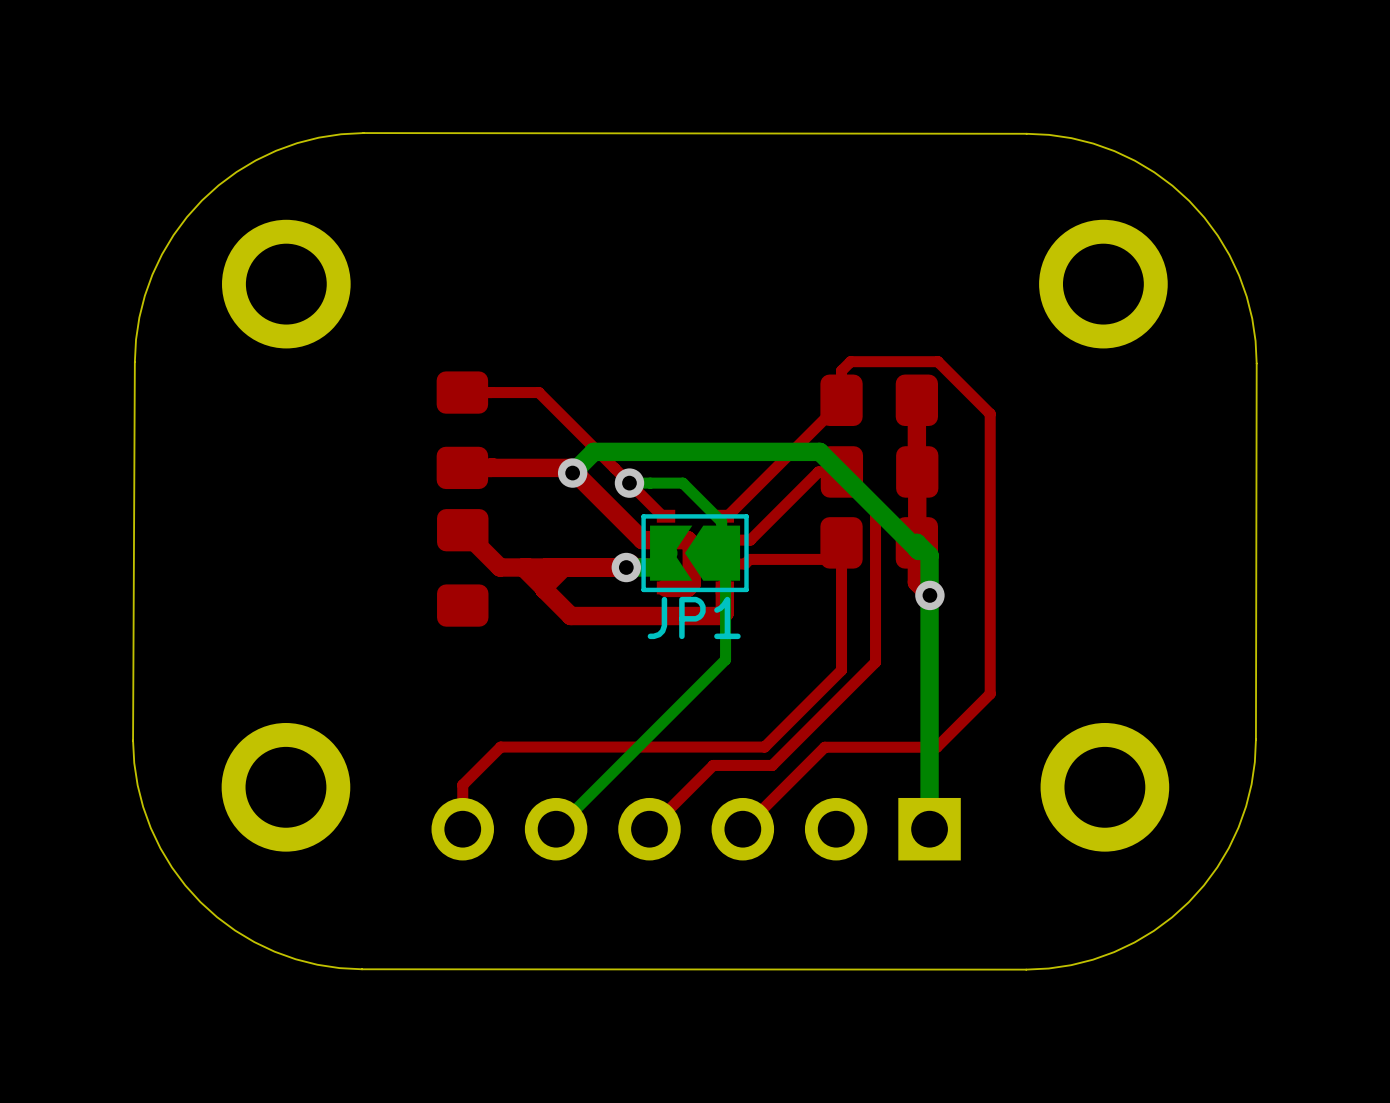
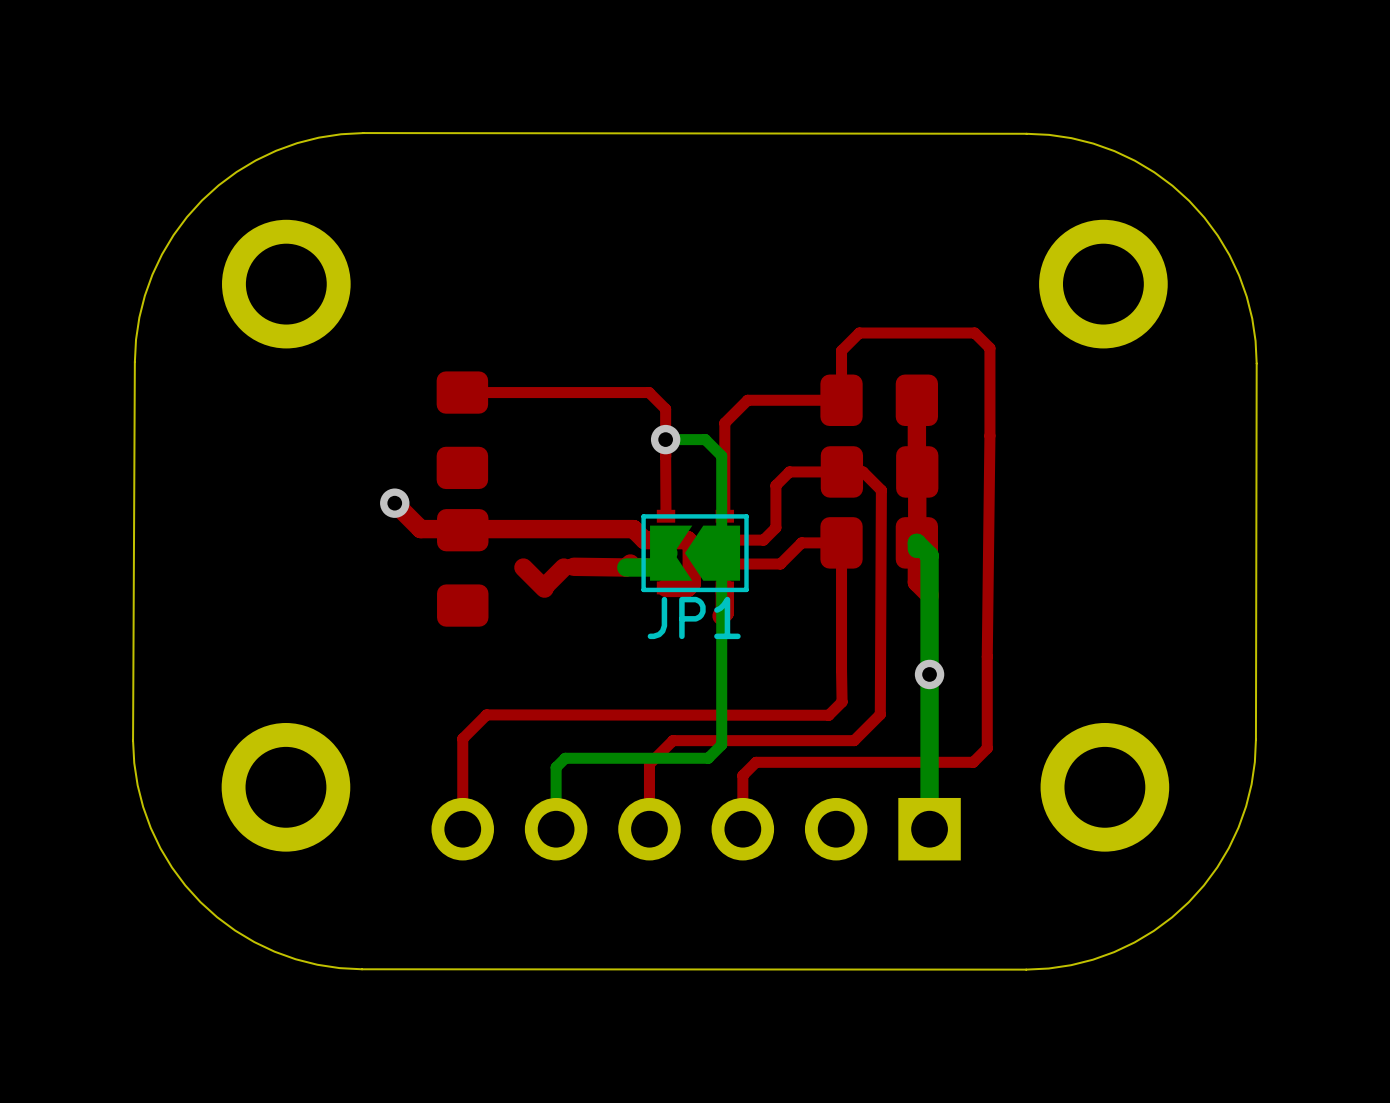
top track: (841, 370) (850, 361) (937, 361) (990, 413) (990, 693) (936, 747) (824, 747) (742, 829) -> (841, 370) (841, 350) (859, 333) (974, 333) (989, 348) (987, 748) (973, 762) (756, 762) (742, 775) (742, 829)
top track: (538, 392) (662, 516) (666, 516) -> (538, 392) (649, 392) (665, 409) (665, 456)
top track: (841, 400) (727, 516) (724, 516) -> (841, 400) (747, 400) (724, 423) (724, 516)
via: none -> (665, 439)
top track: none -> (665, 456) (666, 516)
top track: (462, 467) (570, 467) (642, 540) (644, 540) -> (394, 503) (420, 529) (633, 529) (644, 540)
top track: (818, 471) (750, 540) -> (818, 471) (789, 471) (775, 485) (775, 527) (763, 540) (750, 540)
top track: (841, 471) (875, 505) (875, 662) (772, 765) (713, 765) (649, 829) -> (841, 471) (863, 471) (881, 490) (880, 714) (854, 740) (673, 740) (649, 764) (649, 829)
bottom track: (572, 473) (593, 451) (819, 451) (918, 550) -> none
via: (572, 473) -> none
bottom track: (629, 483) (682, 483) (721, 521) -> (665, 439) (705, 439) (721, 455) (721, 521)
via: (629, 483) -> none
via: none -> (394, 503)
top track: (462, 530) (500, 567) (626, 567) -> (573, 566) (626, 567)
bottom track: (721, 553) (725, 555) (725, 659) (556, 829) -> (721, 553) (721, 744) (708, 758) (565, 758) (556, 767) (556, 829)
top track: (836, 554) (831, 559) (749, 559) (745, 564) -> (841, 542) (801, 542) (780, 564) (745, 564)
top track: (546, 567) (544, 569) (544, 589) (570, 616) (721, 616) -> none
via: (626, 567) -> none
via position: (929, 595) -> (929, 674)
top track: (841, 670) (764, 747) (500, 747) (462, 785) -> (841, 670) (842, 702) (828, 715) (486, 714) (462, 738) (462, 785)

